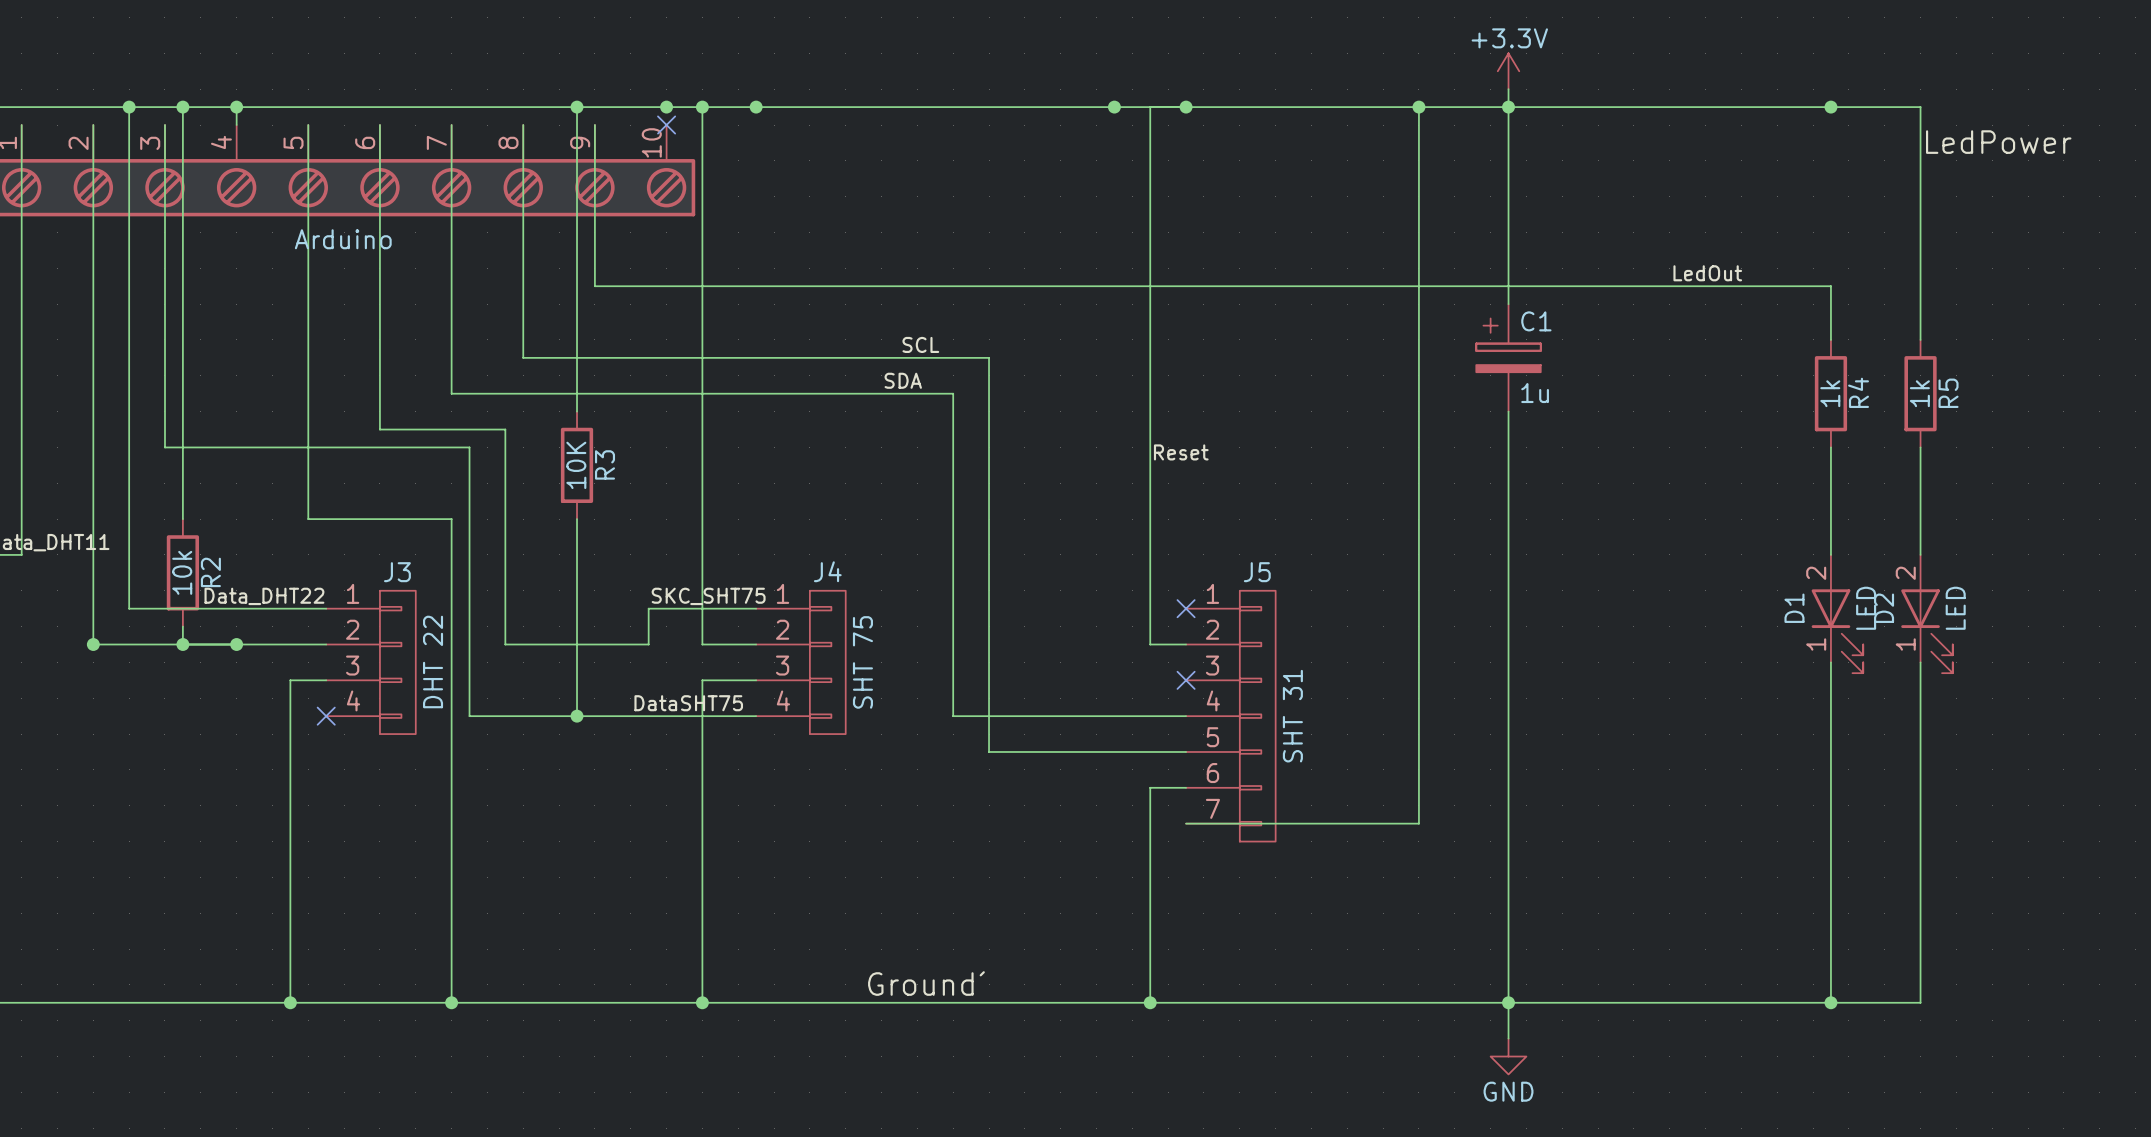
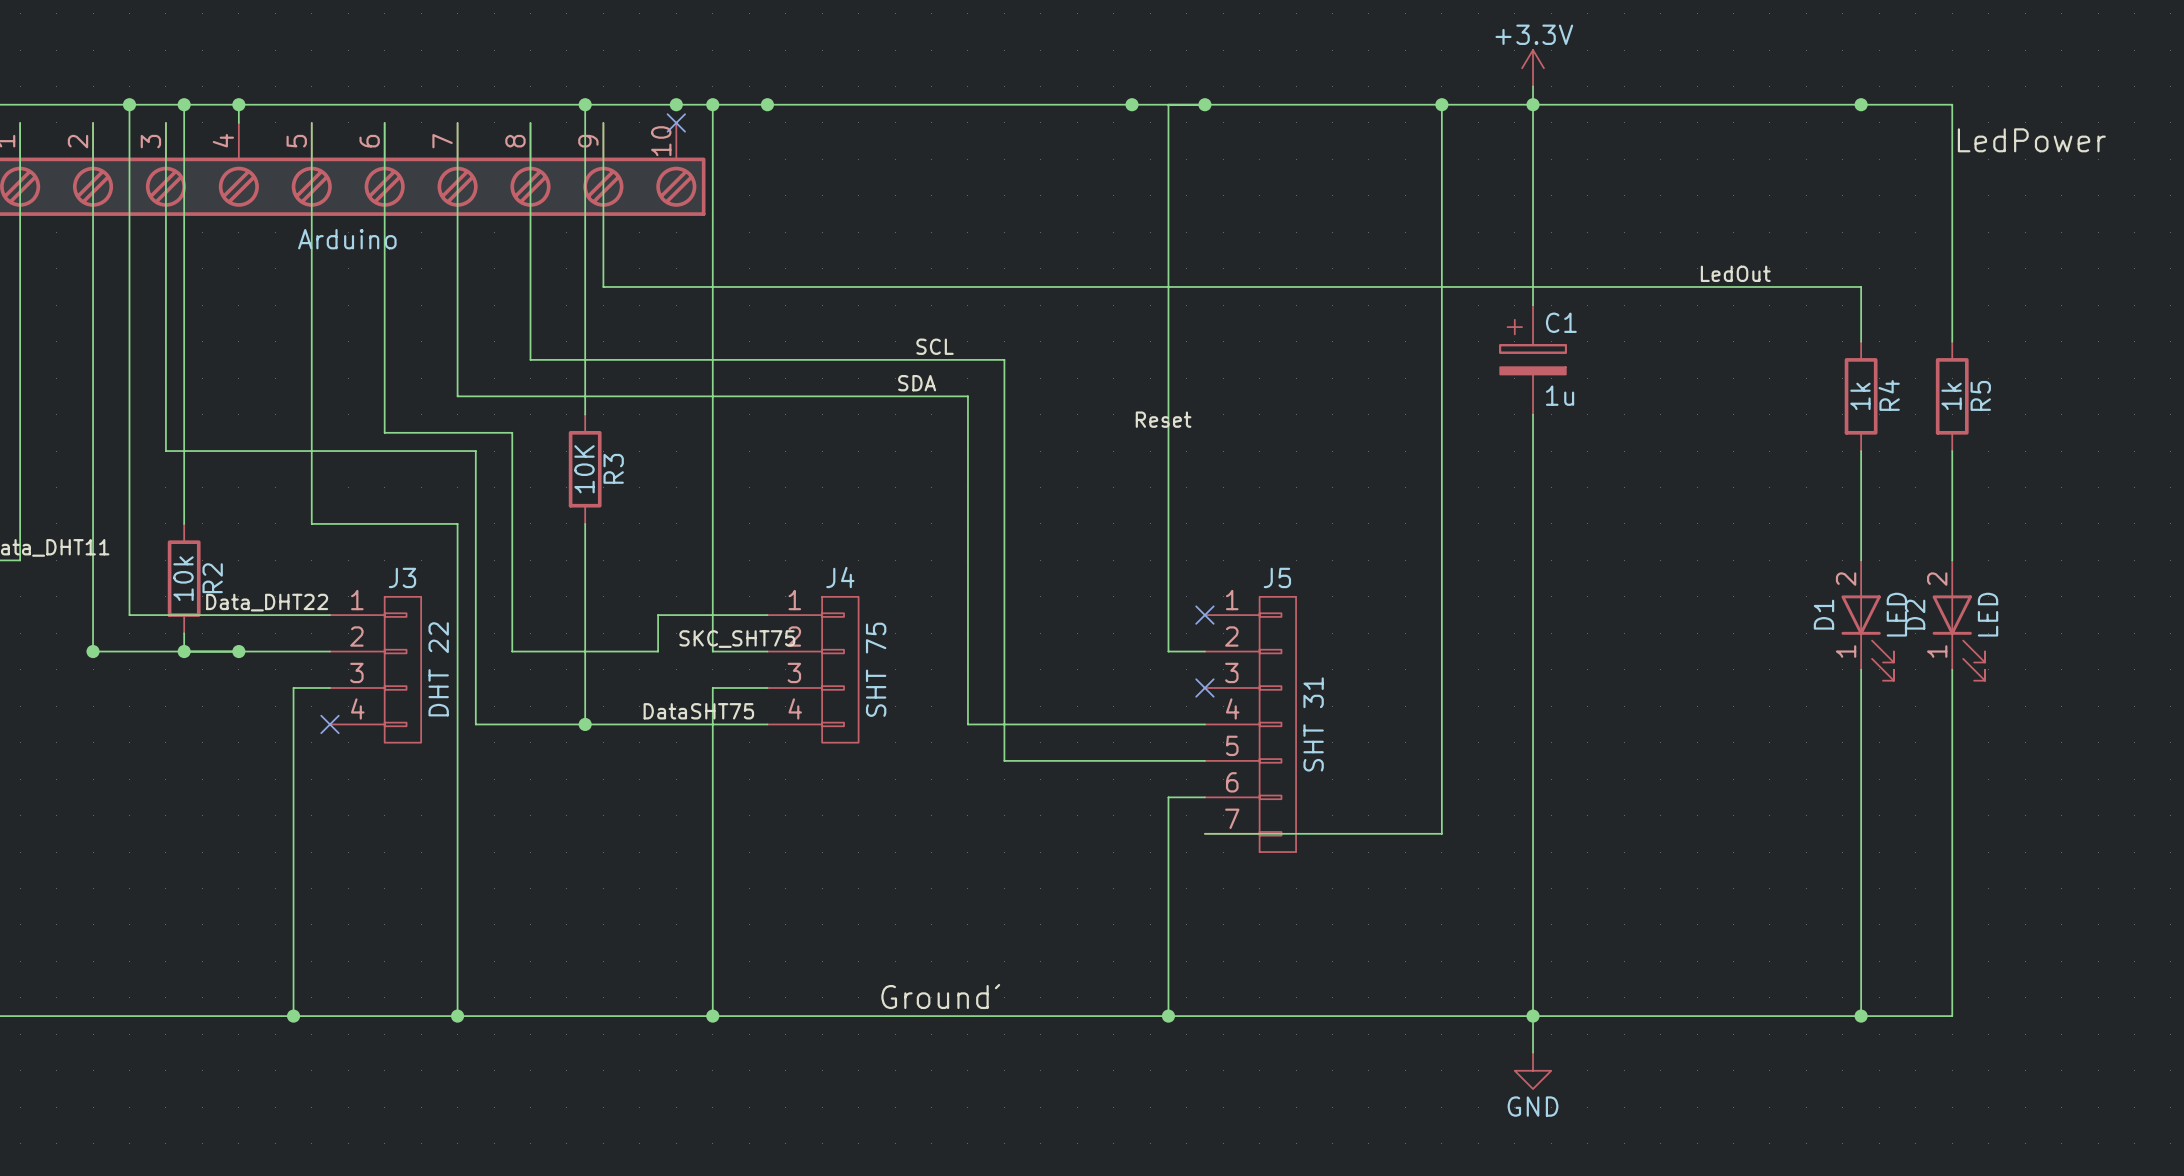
label position: Reset (1181, 452) -> Reset (1163, 419)
label position: SKC_SHT75 (708, 596) -> SKC_SHT75 (737, 639)

